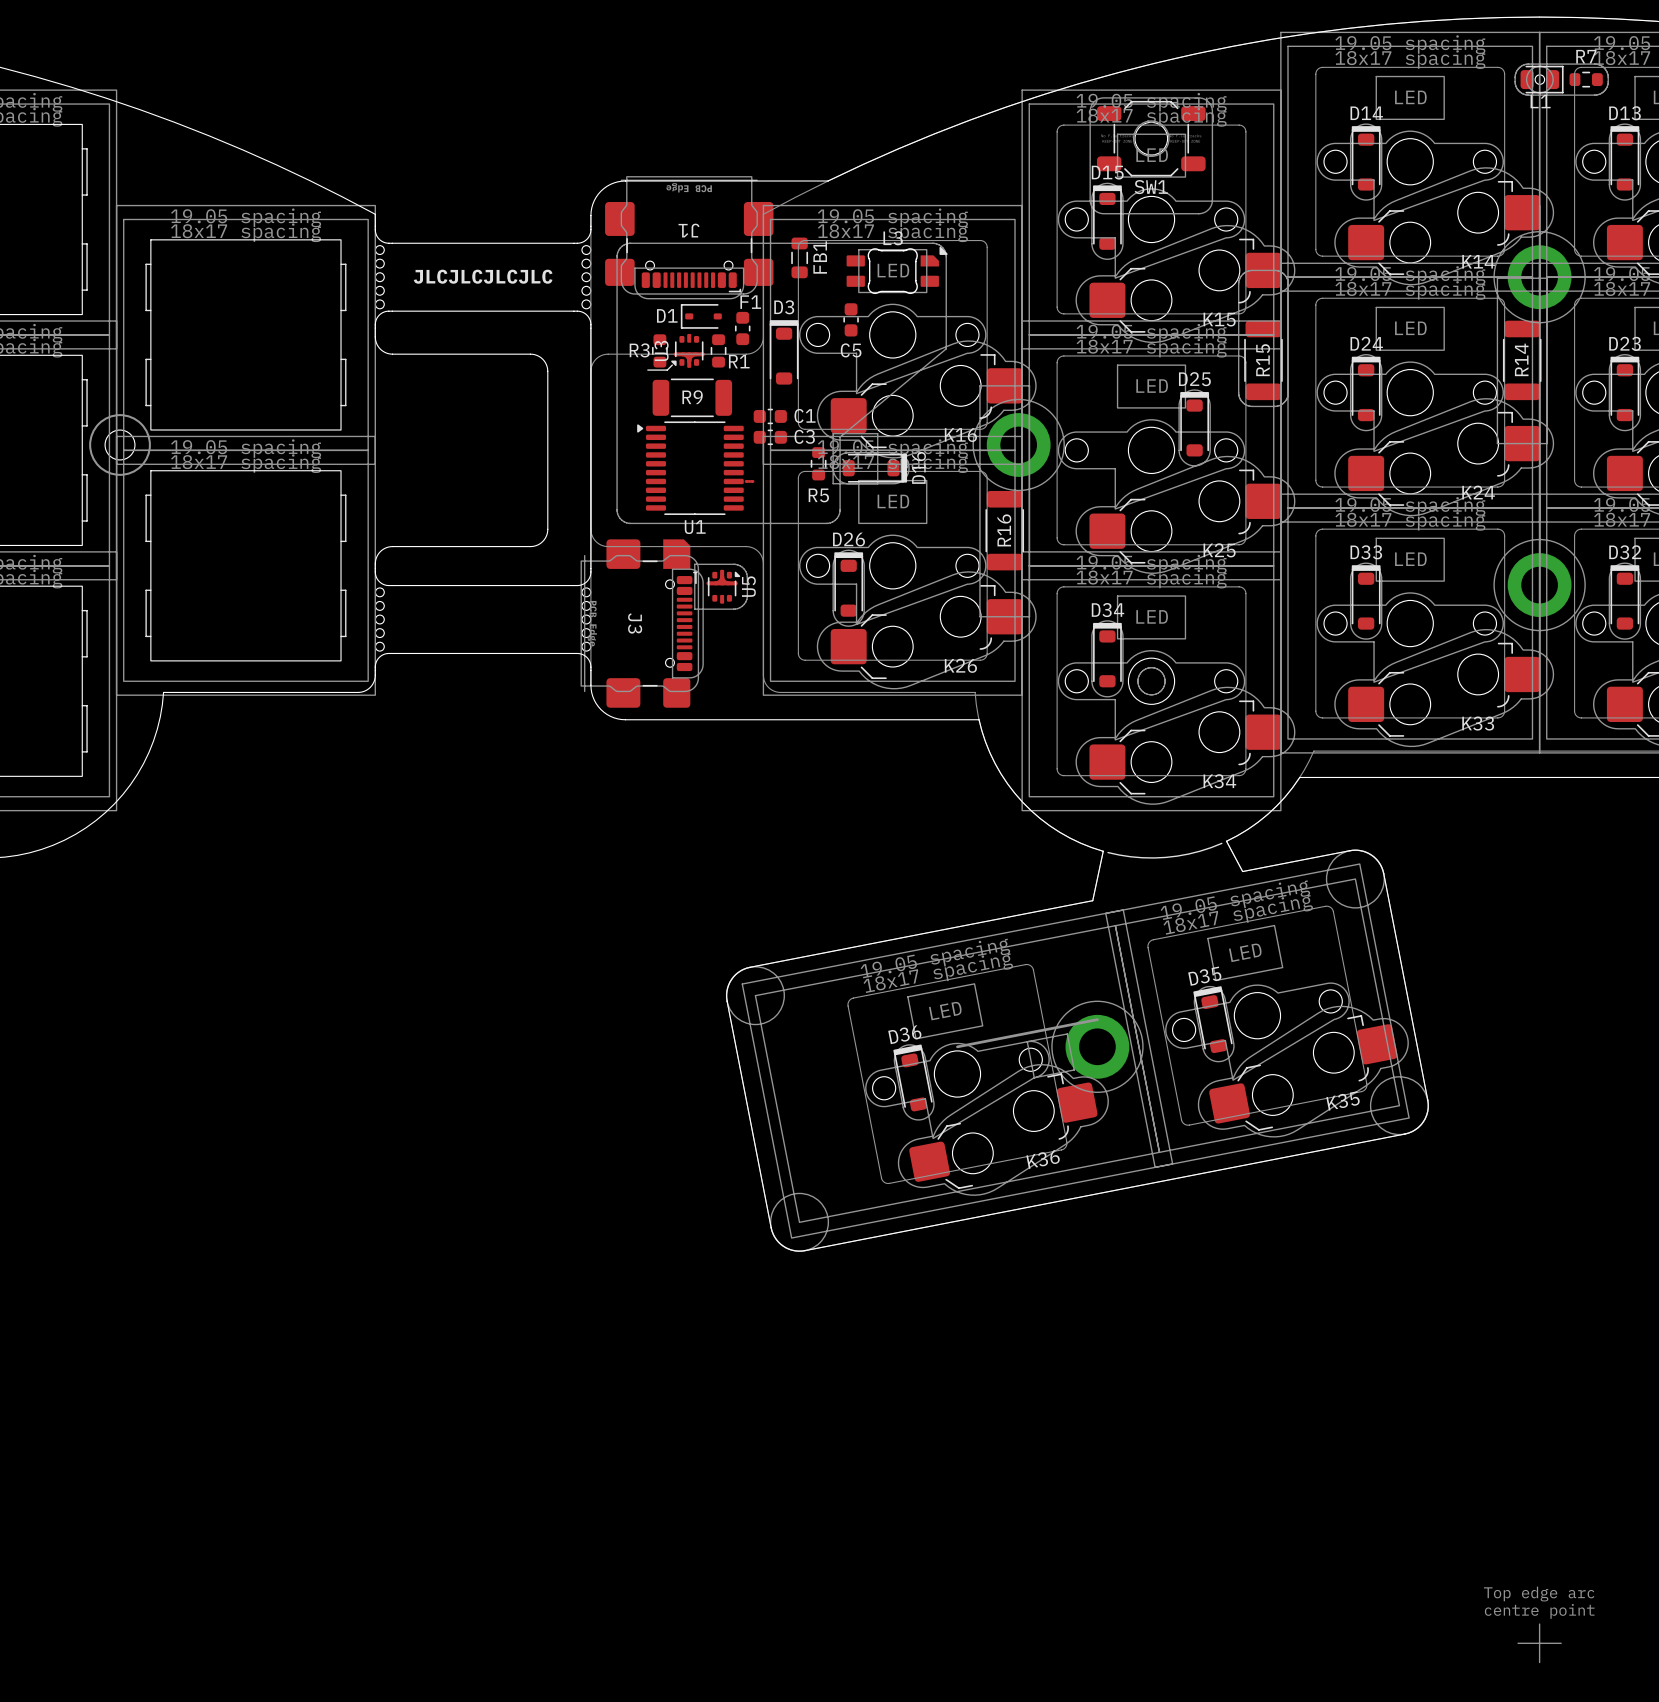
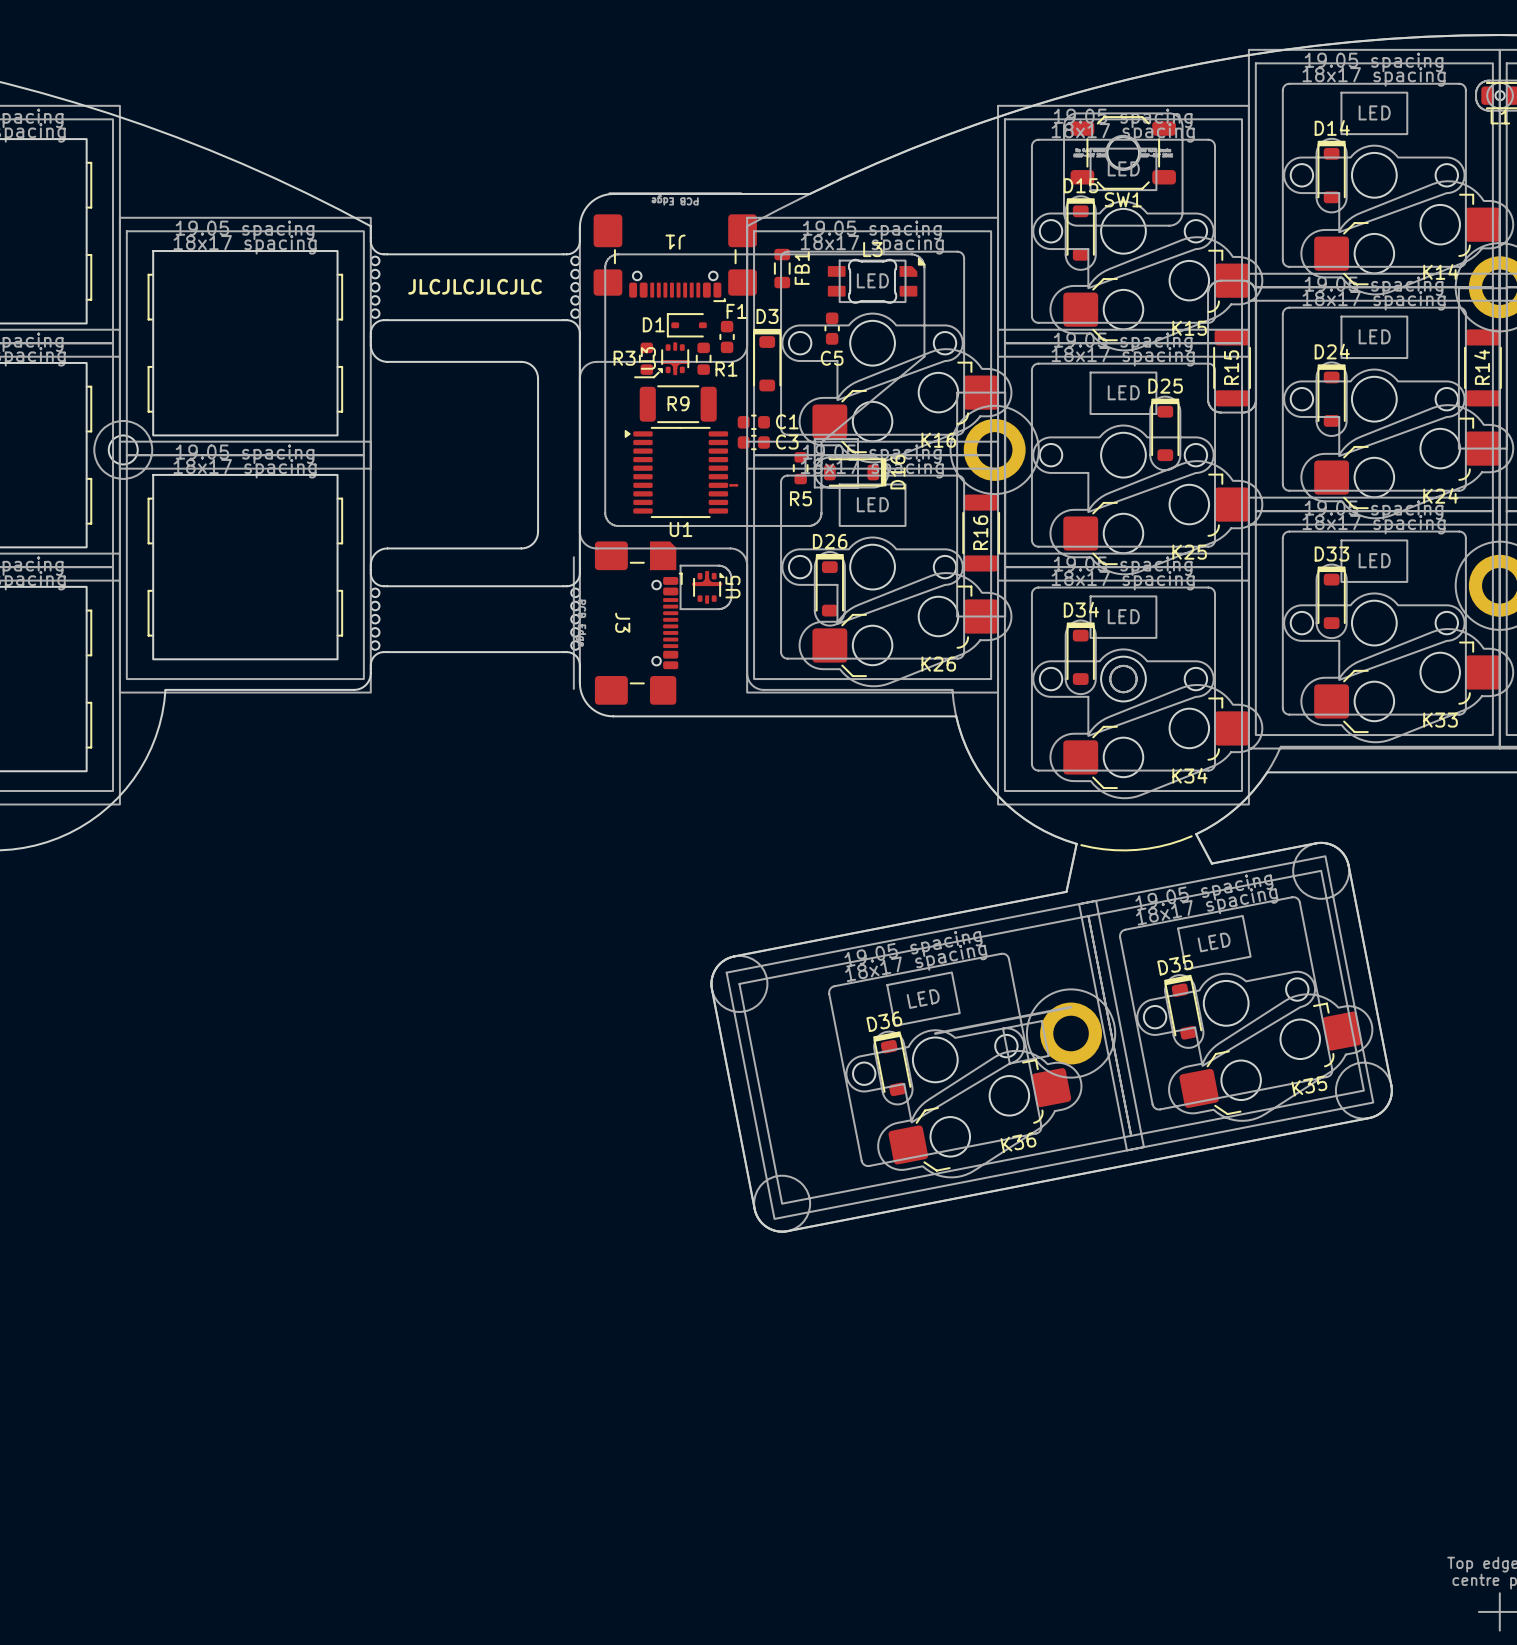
J1 footprint: [605, 176, 774, 300] -> [593, 192, 757, 302]
J3 footprint: [580, 539, 704, 708] -> [573, 541, 683, 705]

